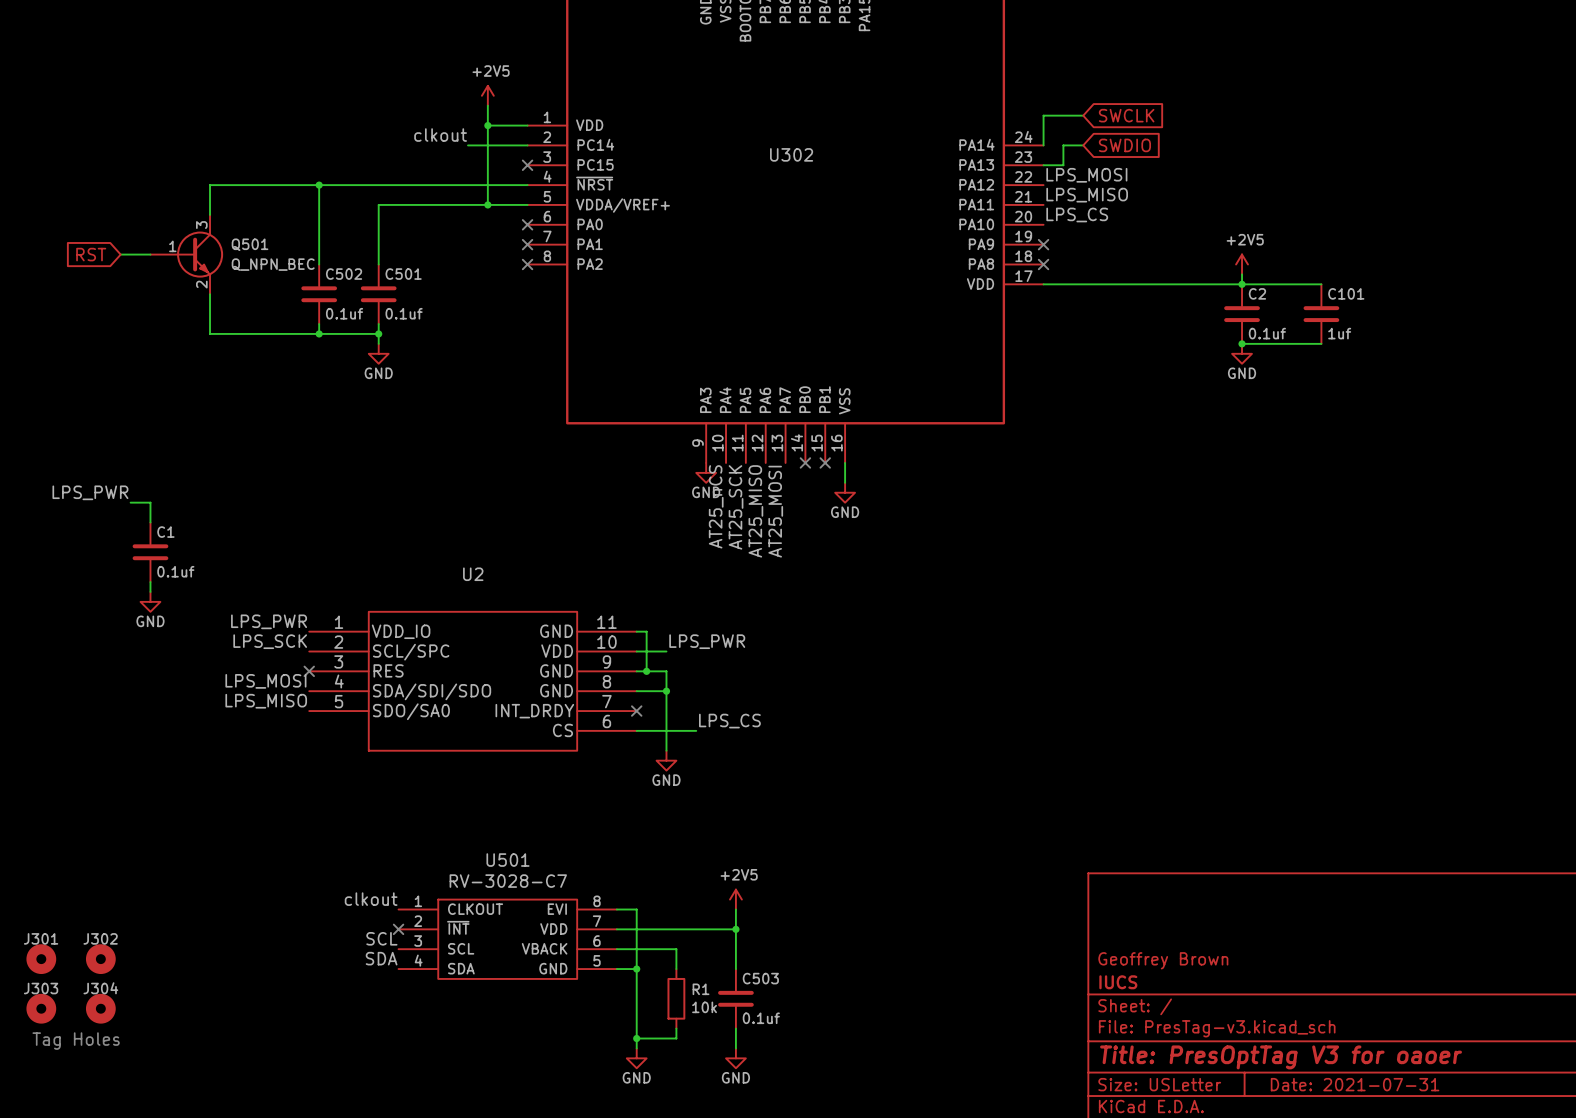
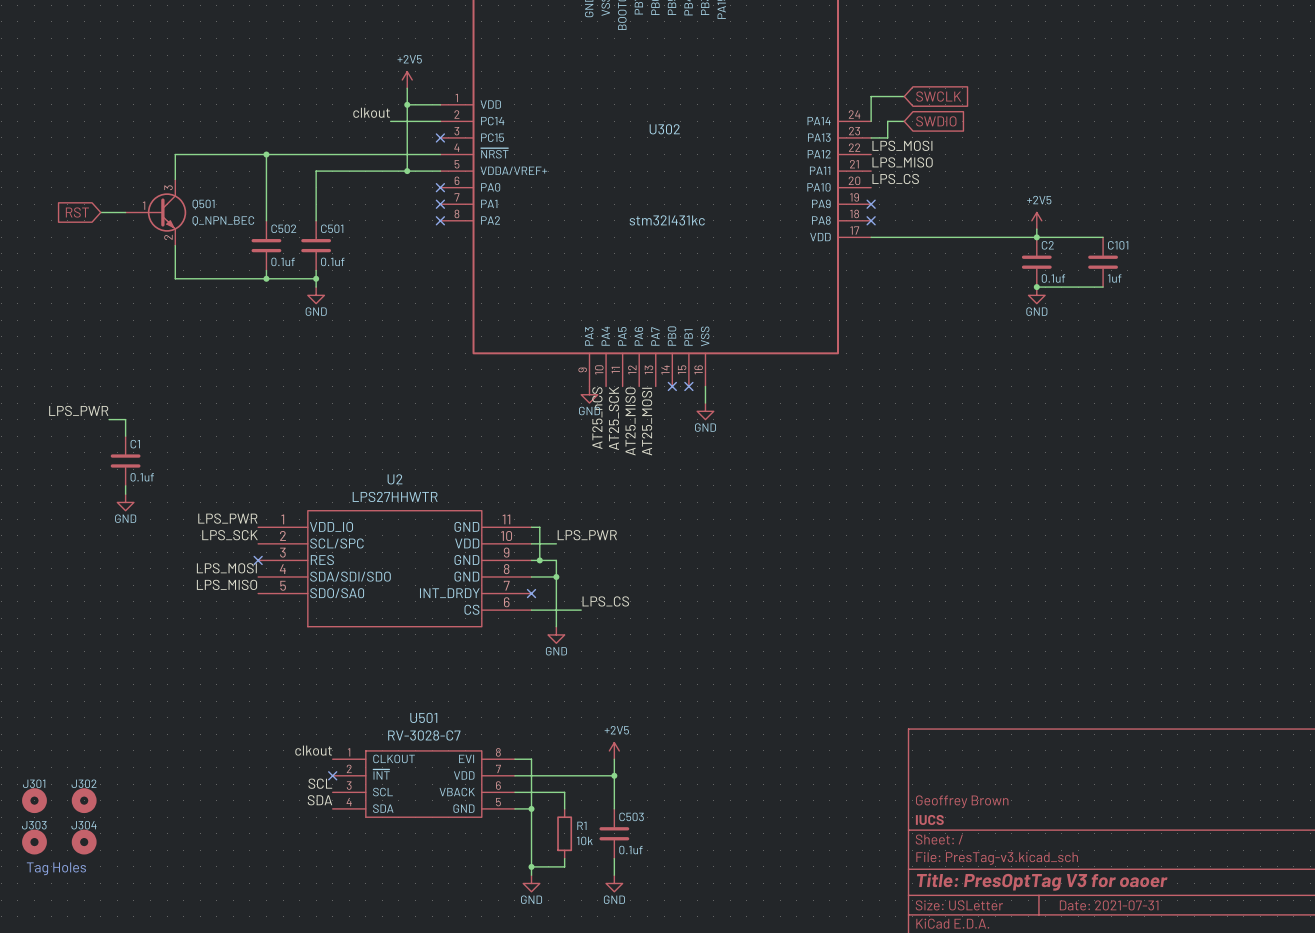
U302 value: none -> stm32l431kc (667, 220)
U2 value: none -> LPS27HHWTR (395, 496)

